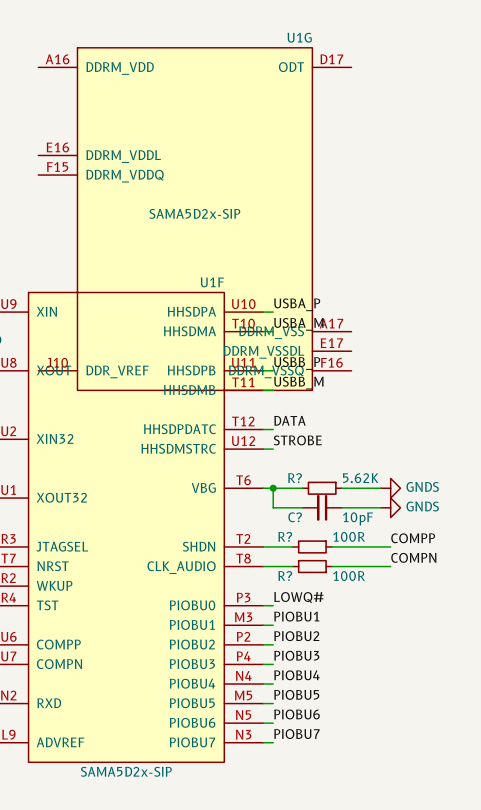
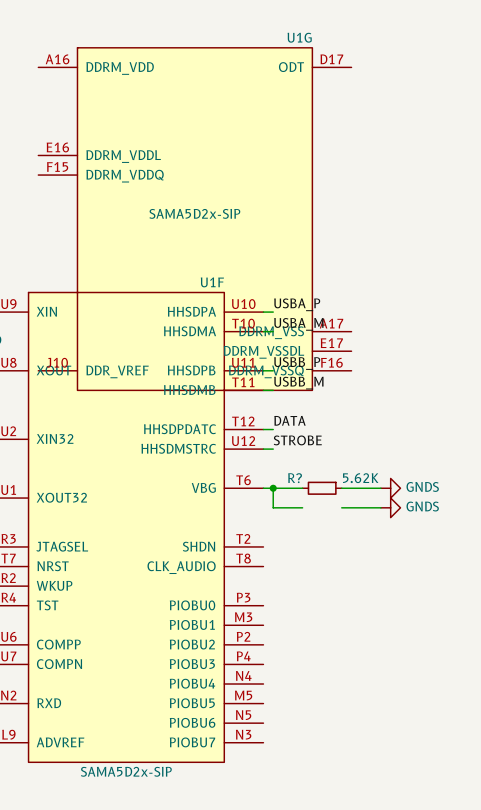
C?: 10pF (322, 507) -> none
label: COMPP (413, 538) -> none
wire: (263, 546) (292, 546) -> none
R?: 100R (312, 546) -> none
wire: (331, 546) (390, 546) -> none
label: COMPN (413, 557) -> none
wire: (263, 566) (292, 566) -> none
R?: 100R (312, 566) -> none
wire: (331, 566) (390, 566) -> none
label: LOWQ# (298, 597) -> none
wire: (263, 605) (273, 605) -> none
label: PIOBU1 (296, 616) -> none
wire: (263, 625) (273, 625) -> none
label: PIOBU2 (296, 636) -> none
wire: (263, 644) (273, 644) -> none
label: PIOBU3 (296, 655) -> none
wire: (263, 664) (273, 664) -> none
label: PIOBU4 (296, 675) -> none
wire: (263, 684) (273, 684) -> none
label: PIOBU5 (296, 694) -> none
wire: (263, 703) (273, 703) -> none
label: PIOBU6 (296, 714) -> none
wire: (263, 723) (273, 723) -> none
label: PIOBU7 (296, 734) -> none
wire: (263, 742) (273, 742) -> none

